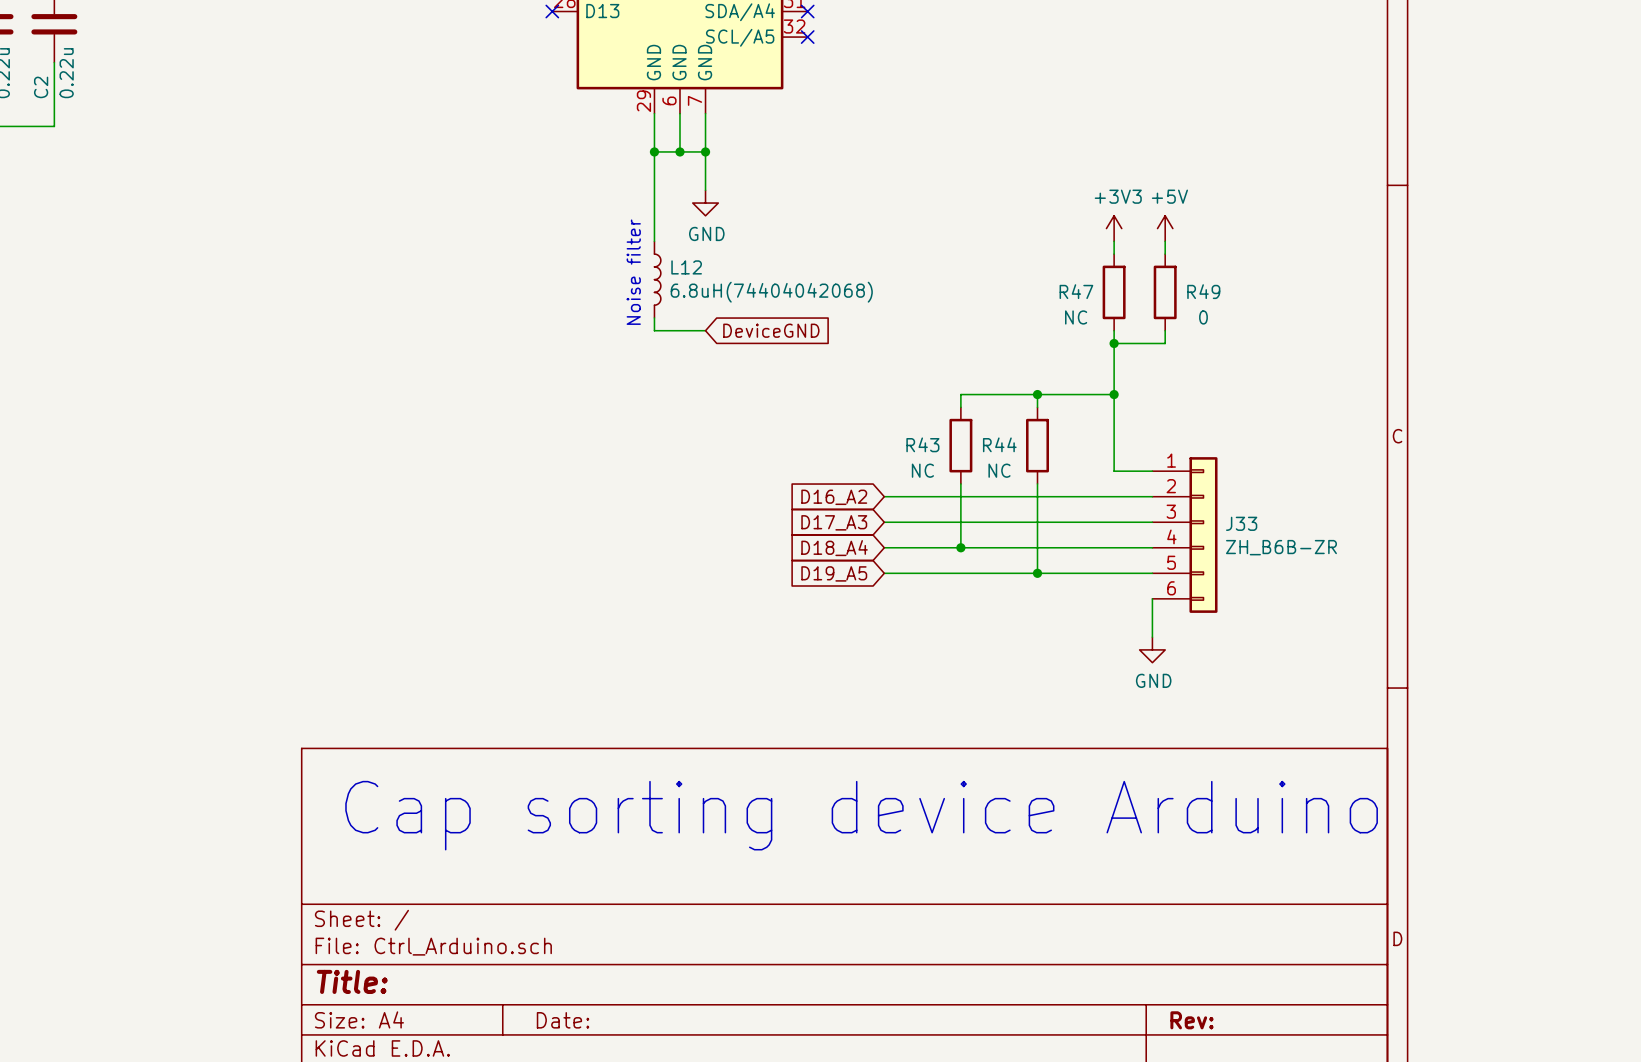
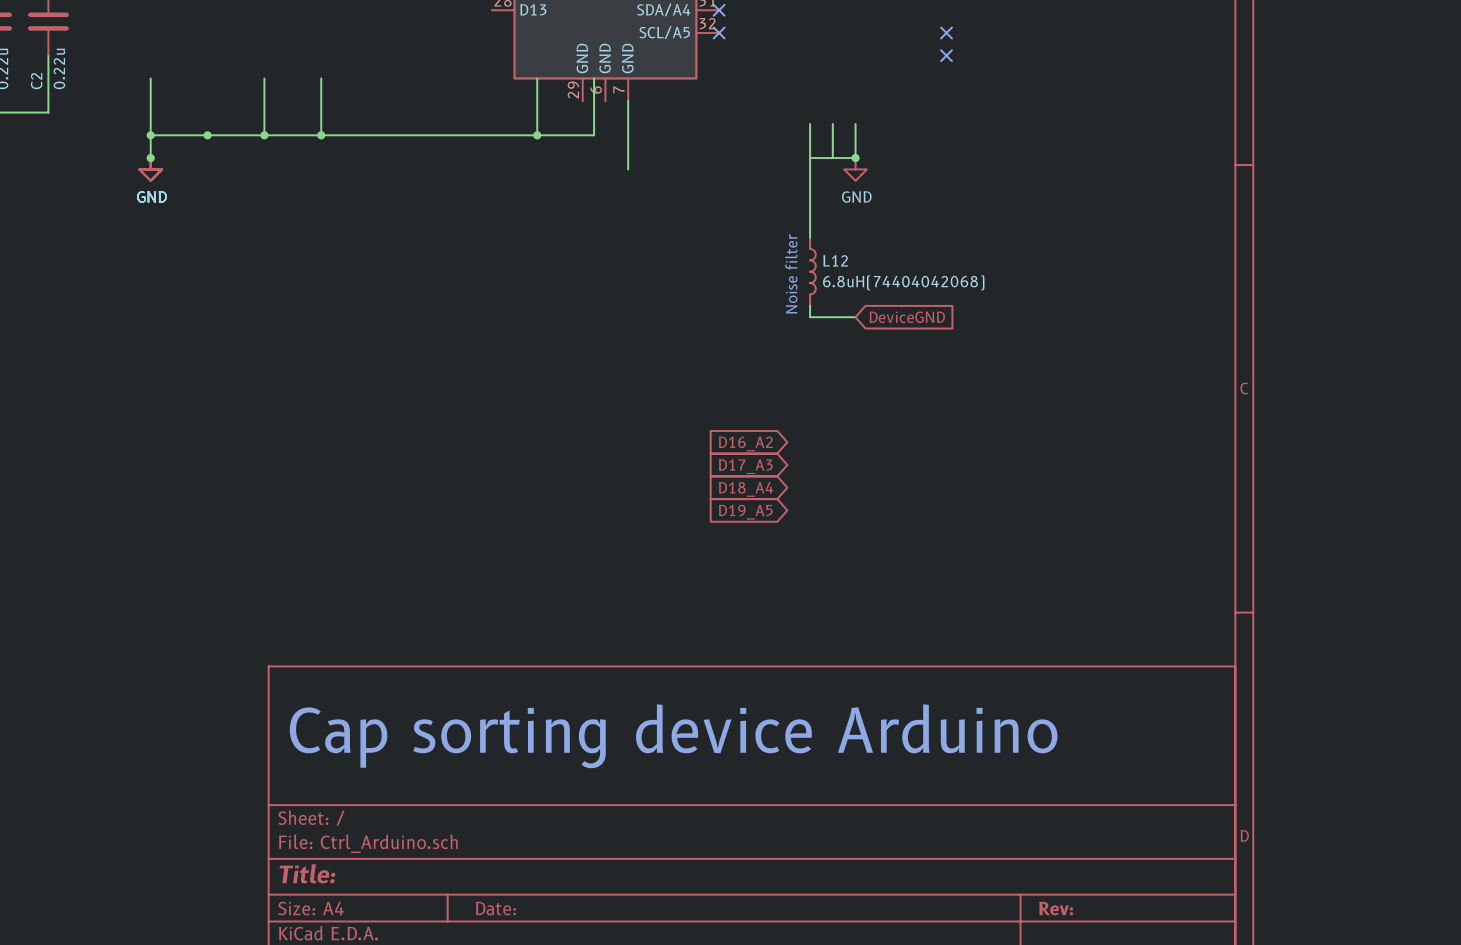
no-connect mark: (552, 11) -> none
no-connect mark: none -> (946, 32)
no-connect mark: none -> (946, 55)
wire: none -> (150, 78) (150, 158)
wire: none -> (264, 78) (264, 135)
wire: none -> (321, 78) (321, 135)
wire: none -> (537, 78) (537, 135)
wire: (654, 113) (654, 241) -> none
wire: (679, 113) (679, 151) -> none
wire: none -> (810, 123) (810, 237)
wire: none -> (832, 123) (832, 158)
wire: none -> (855, 123) (855, 158) (810, 158)
wire: none -> (150, 135) (582, 135)
junction: none -> (150, 135)
junction: none -> (207, 135)
junction: none -> (264, 135)
junction: none -> (321, 135)
junction: none -> (537, 135)
junction: (654, 151) -> none
wire: (667, 151) (705, 151) -> (594, 135) (594, 78)
junction: (679, 151) -> none
junction: (705, 151) -> none
junction: none -> (150, 158)
junction: none -> (855, 158)
power symbol: none -> GND (150, 169)
power symbol: none -> GND (855, 169)
power symbol: GND (705, 203) -> none
power symbol: +3V3 (1114, 228) -> none
power symbol: +5V (1165, 228) -> none
wire: (1114, 241) (1114, 254) -> none
wire: (1165, 241) (1165, 254) -> none
text: Noise filter (633, 272) -> none
L12 position: (657, 279) -> (812, 271)
R47: NC (1114, 292) -> none
R49: 0 (1165, 292) -> none
text: none -> Noise filter (791, 273)
wire: (654, 317) (654, 330) (705, 330) -> none
global label: DeviceGND (771, 330) -> none
wire: (1114, 330) (1114, 471) (1152, 471) -> none
wire: (1165, 330) (1165, 343) (1114, 343) -> none
wire: none -> (810, 305) (810, 317) (855, 317)
junction: (1114, 343) -> none
global label: none -> DeviceGND (907, 317)
wire: (1037, 394) (1037, 407) -> none
junction: (1037, 394) -> none
wire: (1114, 394) (960, 394) (960, 407) -> none
junction: (1114, 394) -> none
R43: NC (960, 445) -> none
R44: NC (1037, 445) -> none
wire: (960, 483) (960, 547) -> none
wire: (1037, 483) (1037, 573) -> none
wire: (884, 496) (1152, 496) -> none
wire: (884, 522) (1152, 522) -> none
J33: ZH_B6B-ZR (1184, 535) -> none
wire: (884, 547) (1152, 547) -> none
junction: (960, 547) -> none
wire: (884, 573) (1152, 573) -> none
junction: (1037, 573) -> none
wire: (1152, 598) (1152, 637) -> none
power symbol: GND (1152, 649) -> none
text position: Cap sorting device Arduino (861, 815) -> Cap sorting device Arduino (673, 736)

